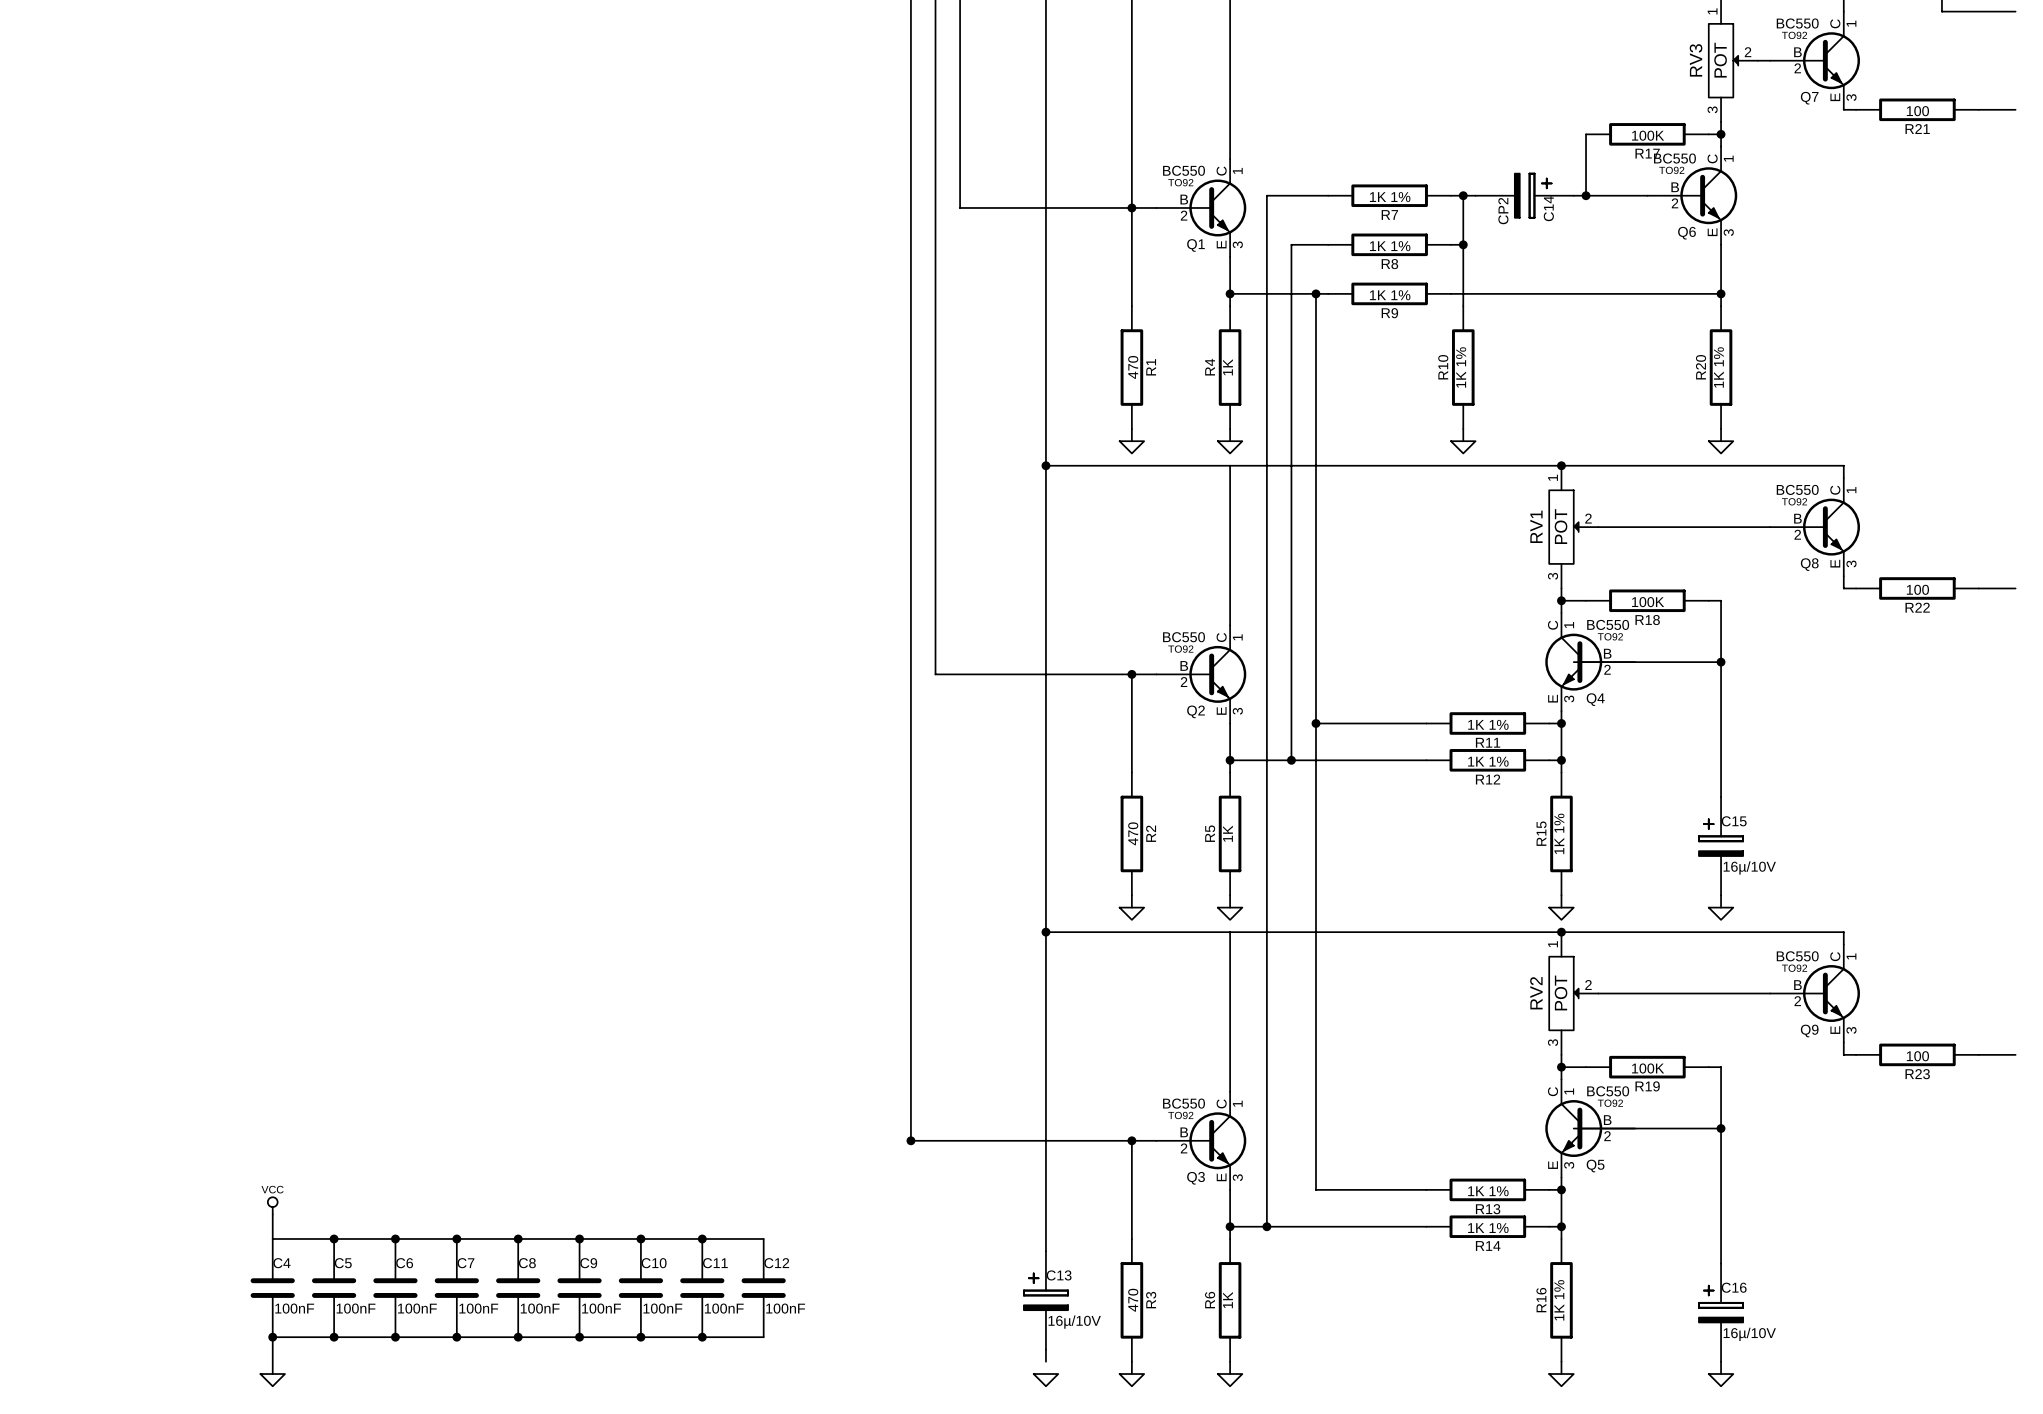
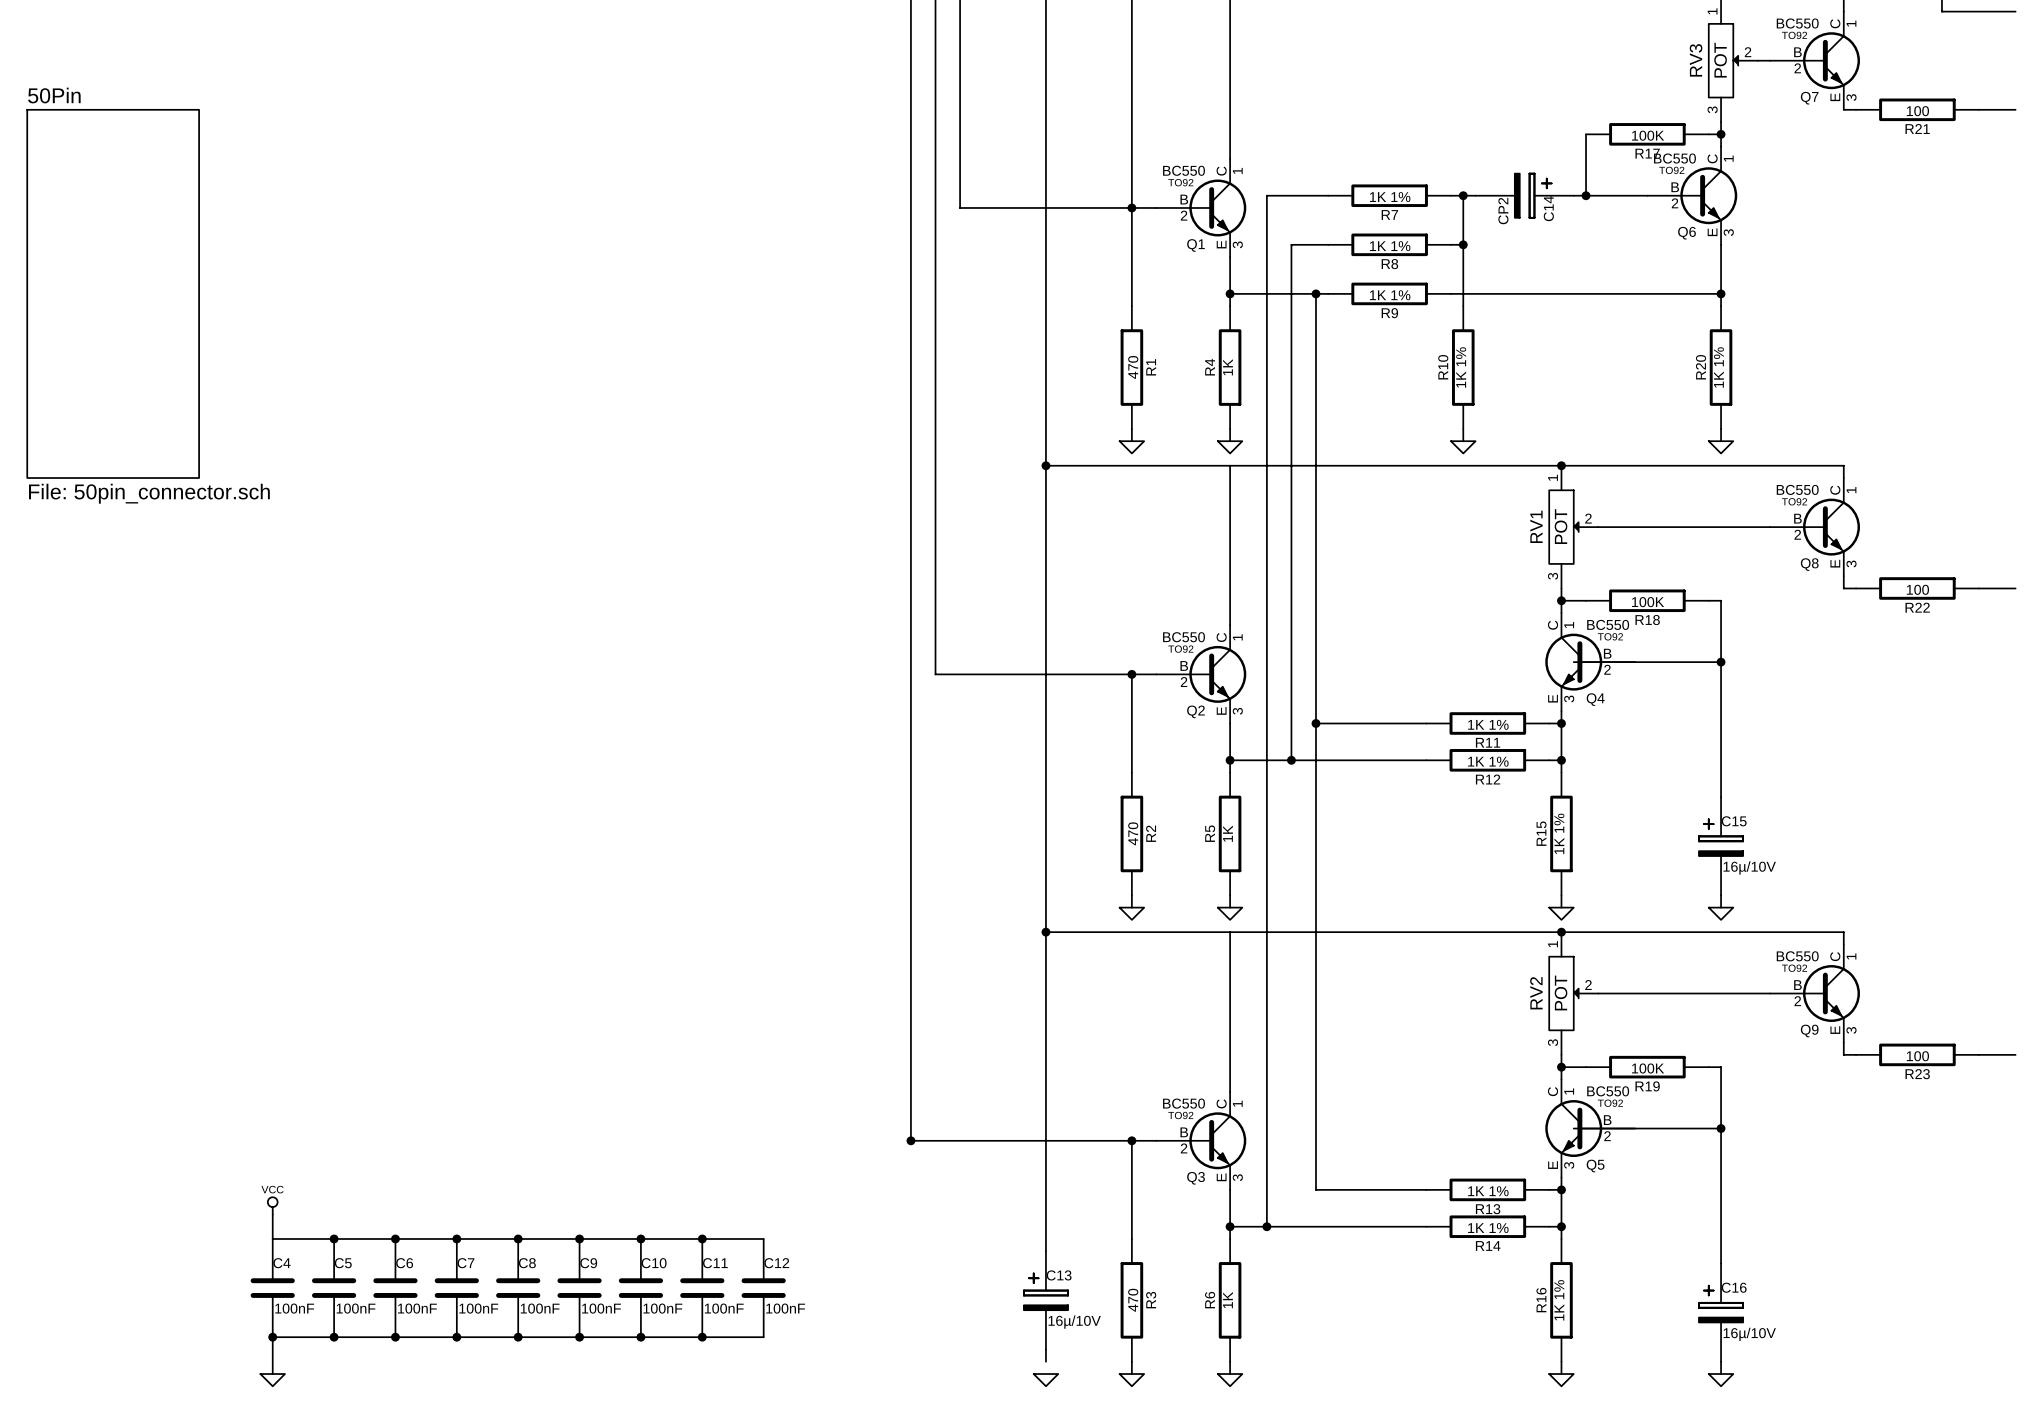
sheet 50Pin: none -> File: 50pin_connector.sch (113, 293)

